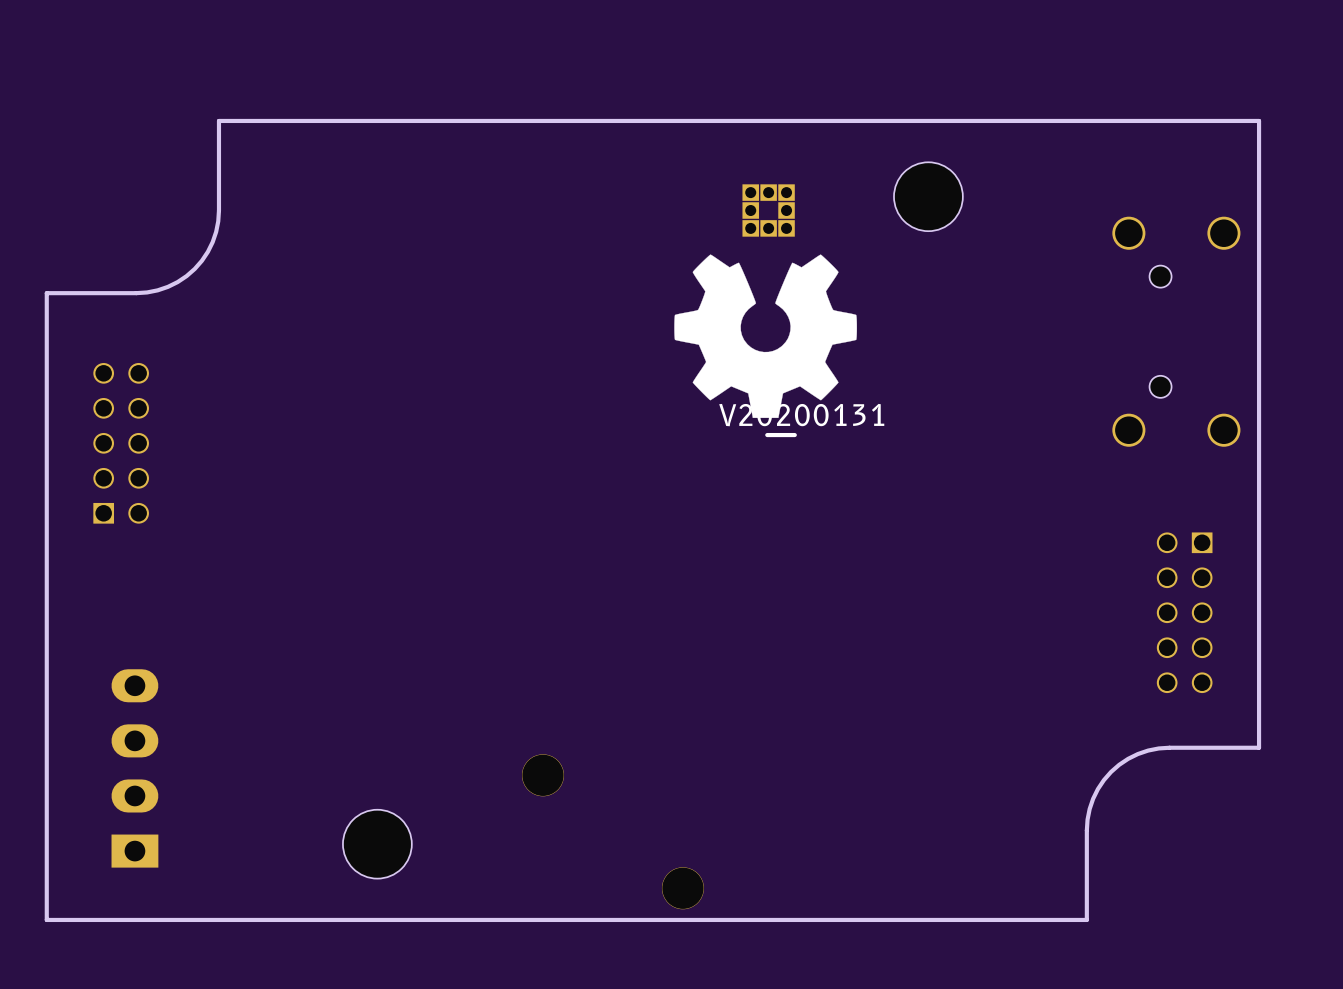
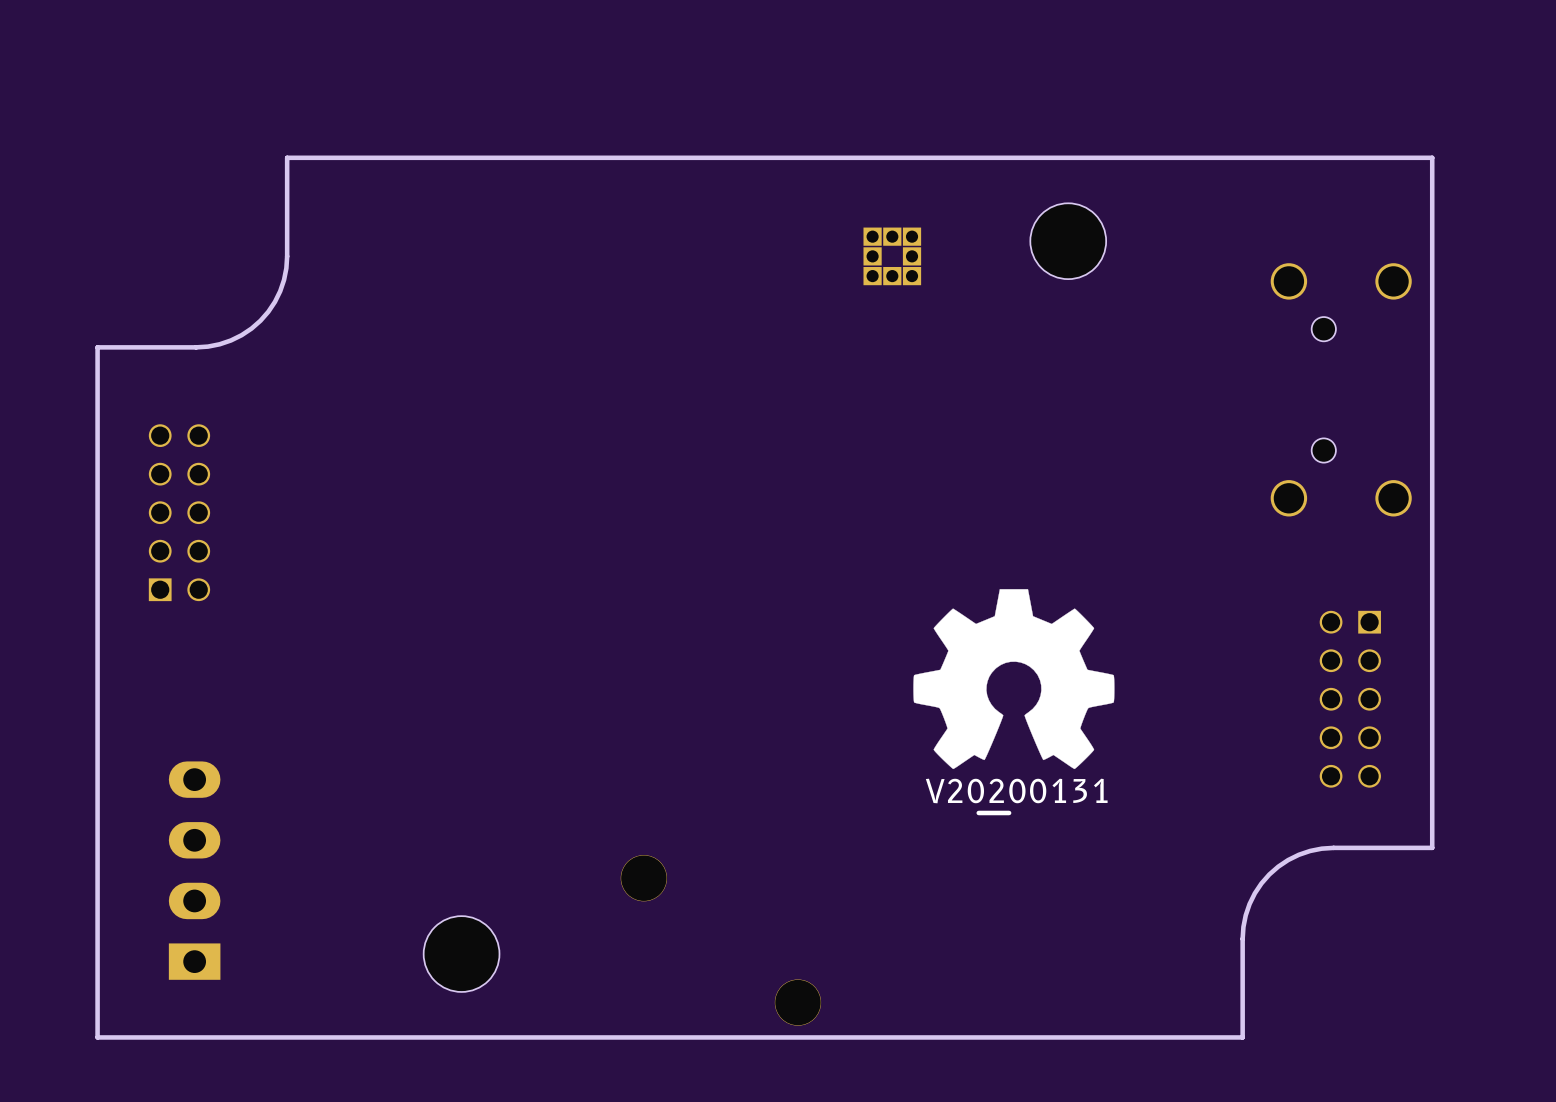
drawing: [674, 254, 857, 418] -> none
drawing position: (781, 435) -> (993, 812)
drawing: none -> [913, 589, 1115, 770]

